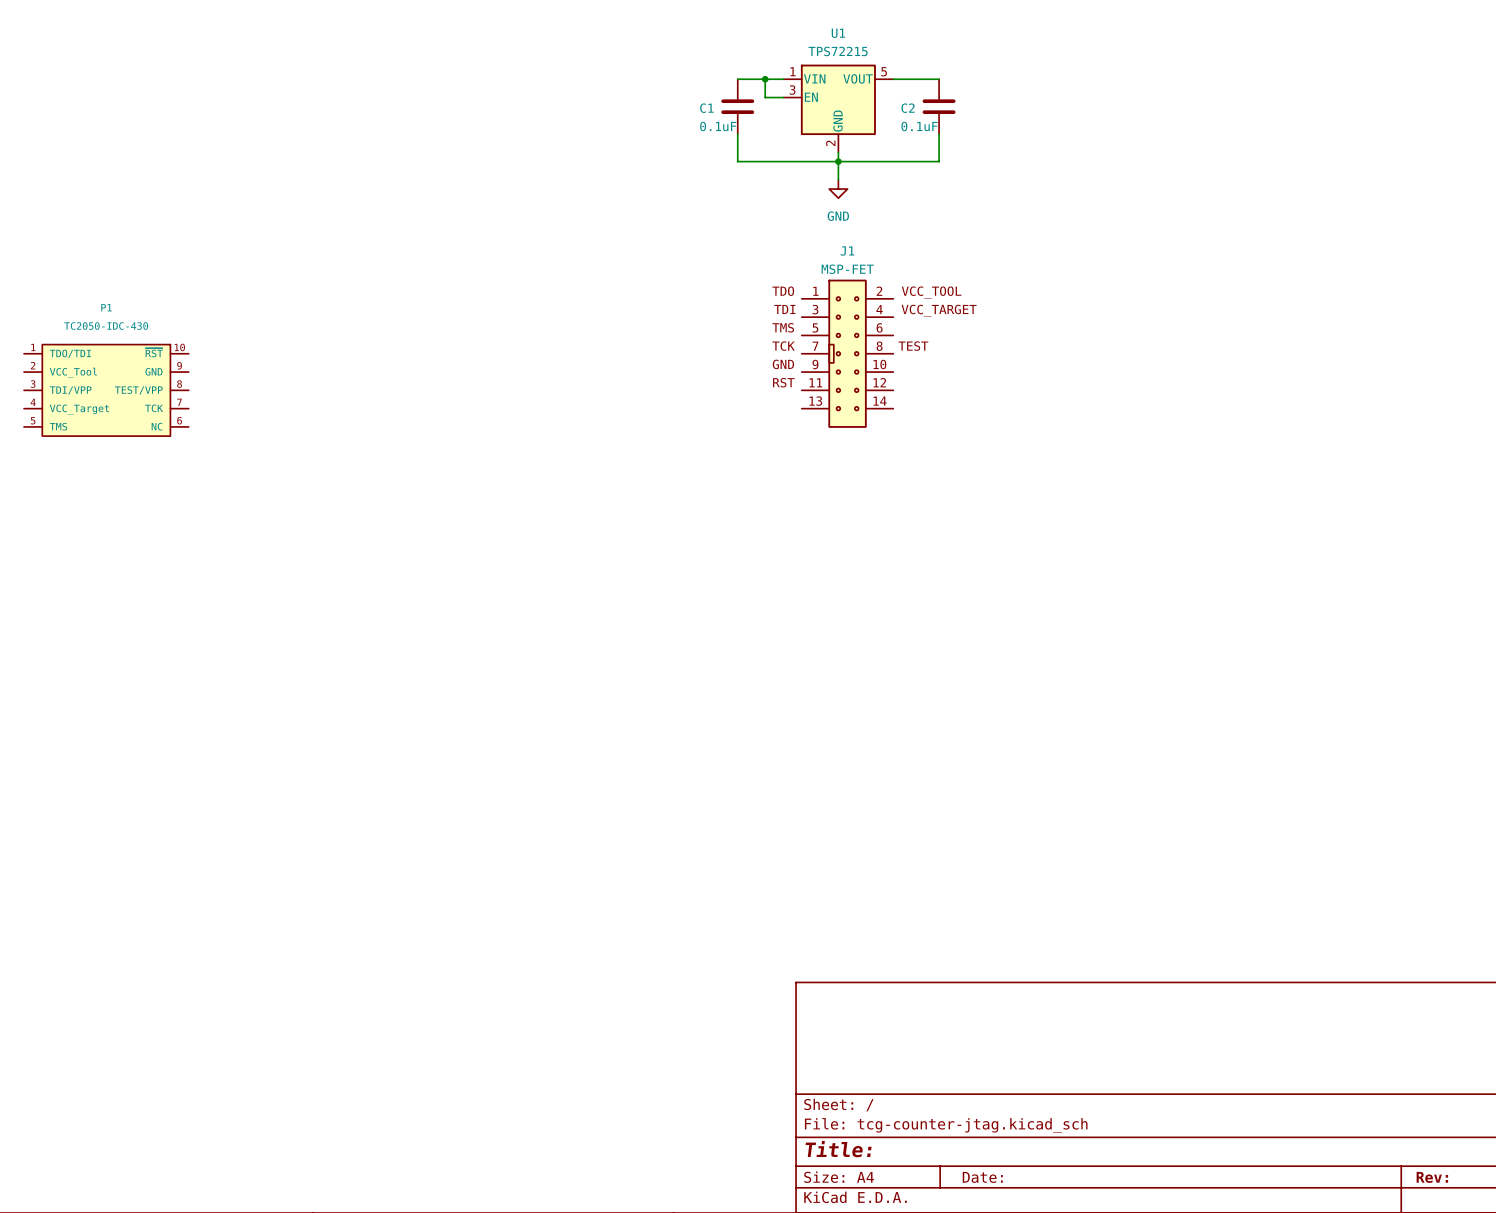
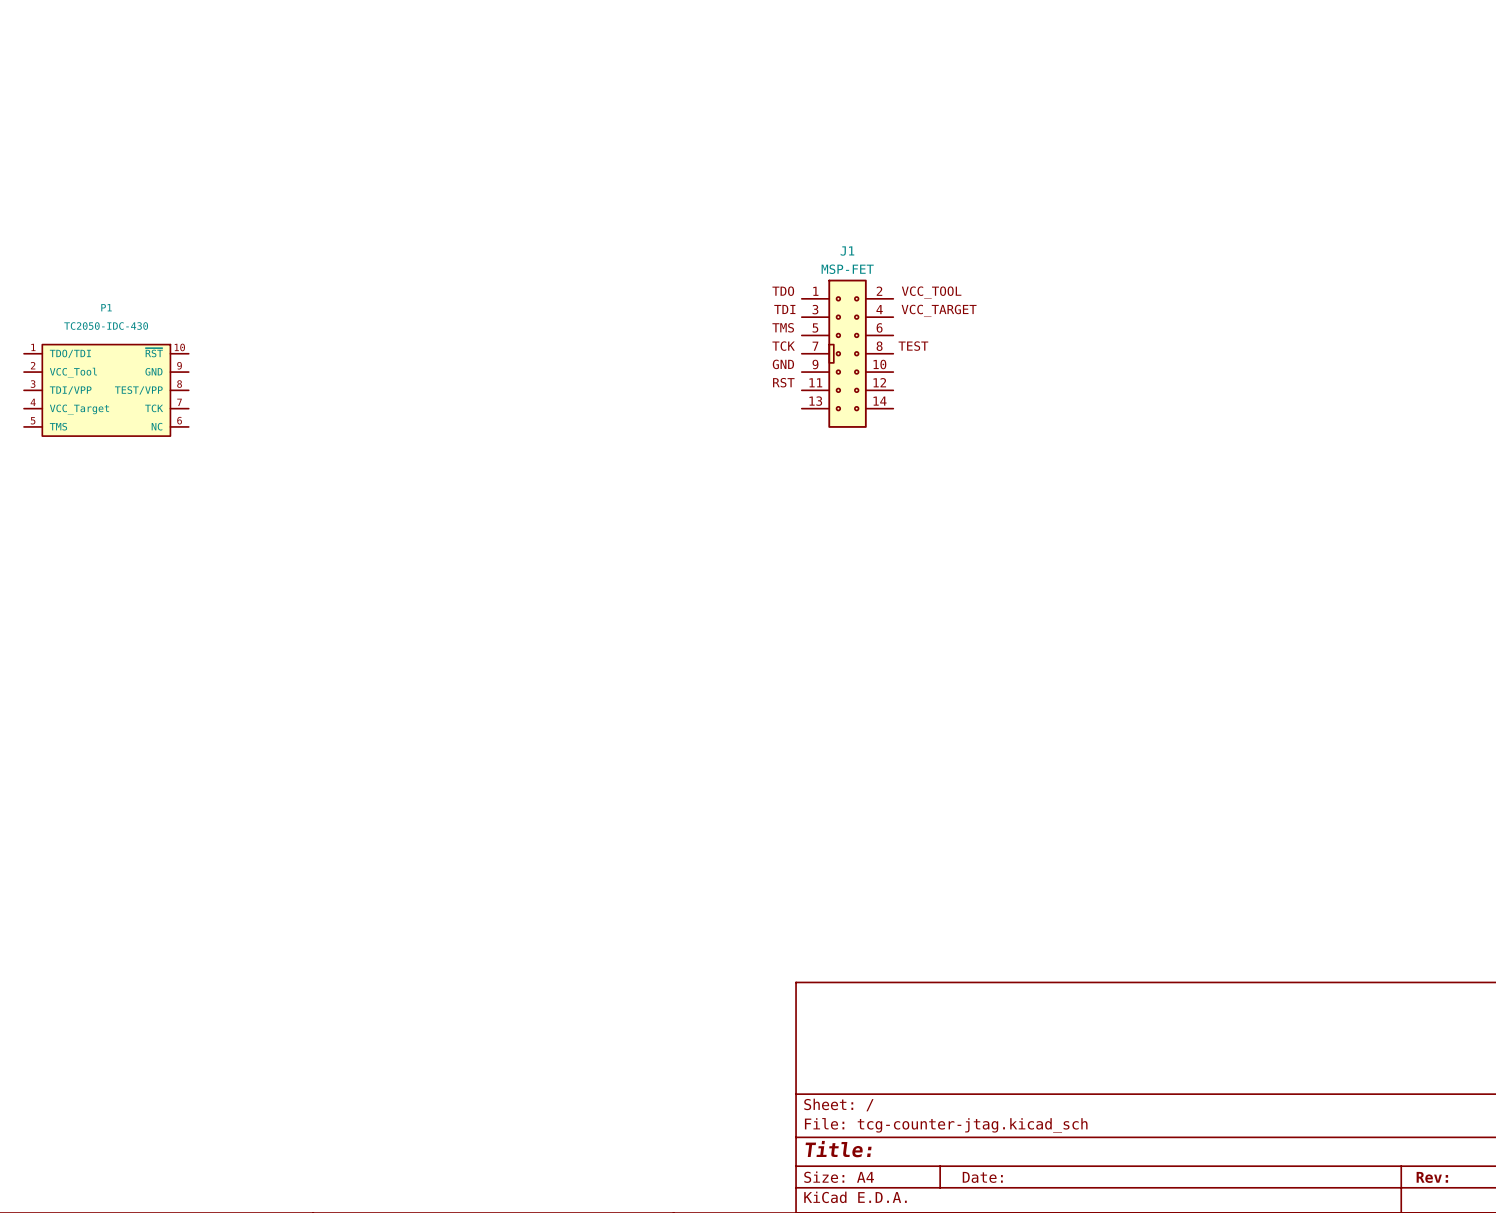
wire: (737, 79) (783, 79) -> none
wire: (765, 79) (765, 97) (783, 97) -> none
junction: (765, 79) -> none
wire: (893, 79) (939, 79) -> none
C1: 0.1uF (737, 106) -> none
C2: 0.1uF (939, 106) -> none
U1: TPS72215 (838, 108) -> none
wire: (737, 134) (737, 161) (939, 161) (939, 134) -> none
wire: (838, 152) (838, 179) -> none
junction: (838, 161) -> none
power symbol: GND (838, 189) -> none

